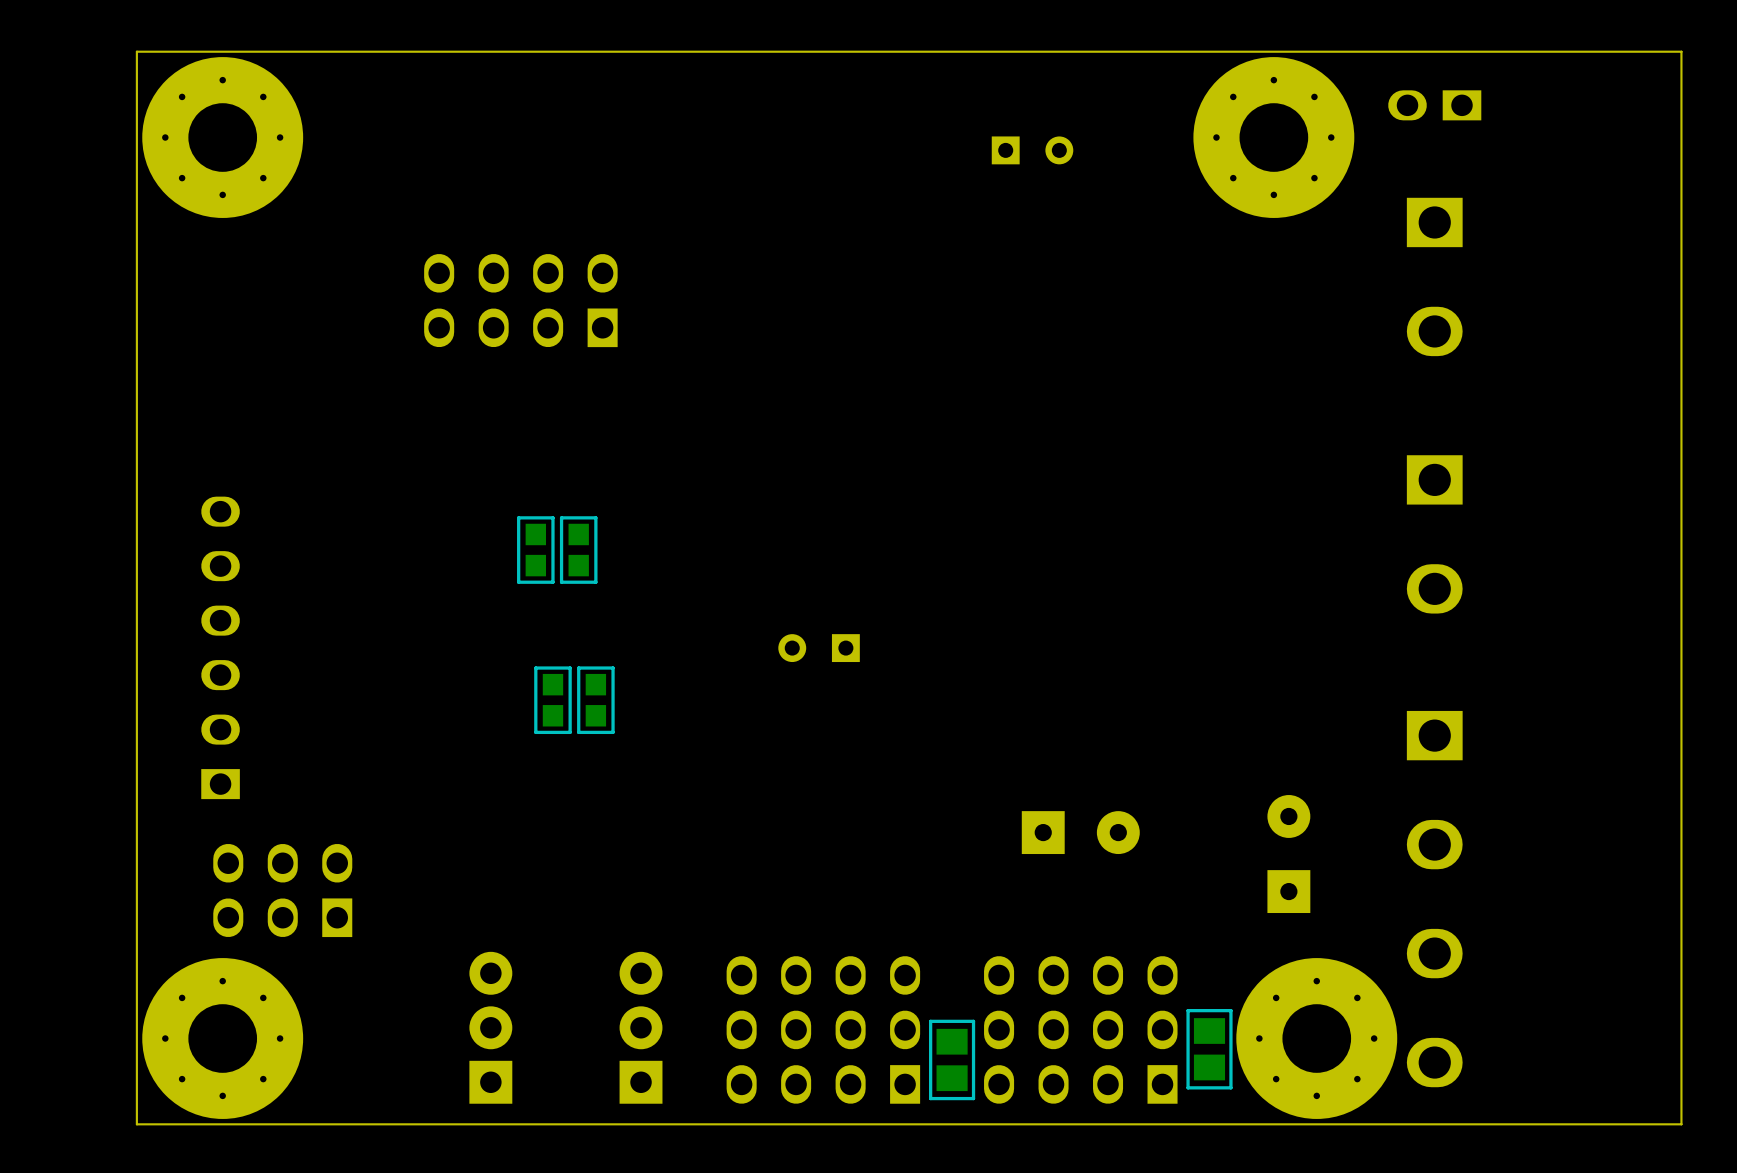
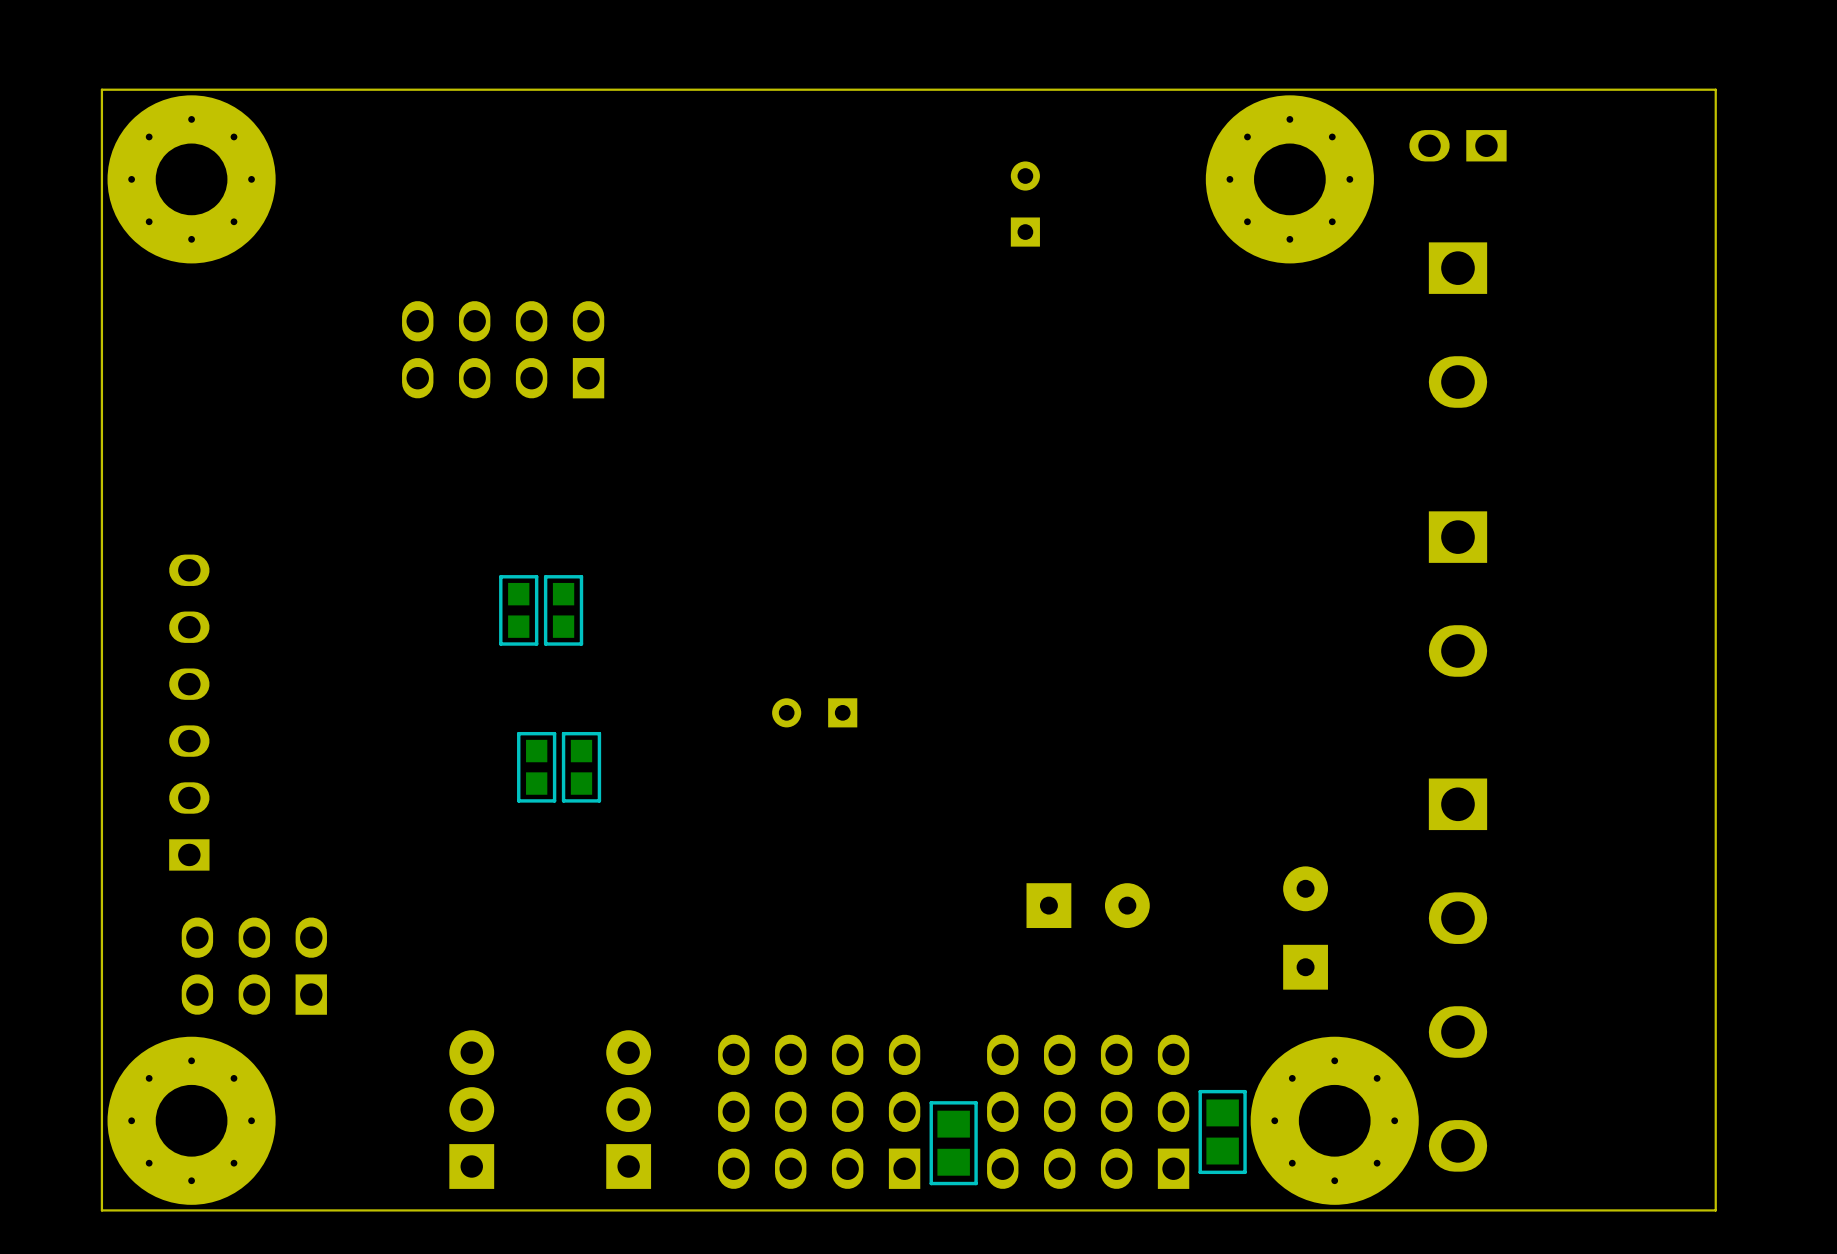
part rotation: 0° (1032, 150) -> 90° counterclockwise (1025, 204)

